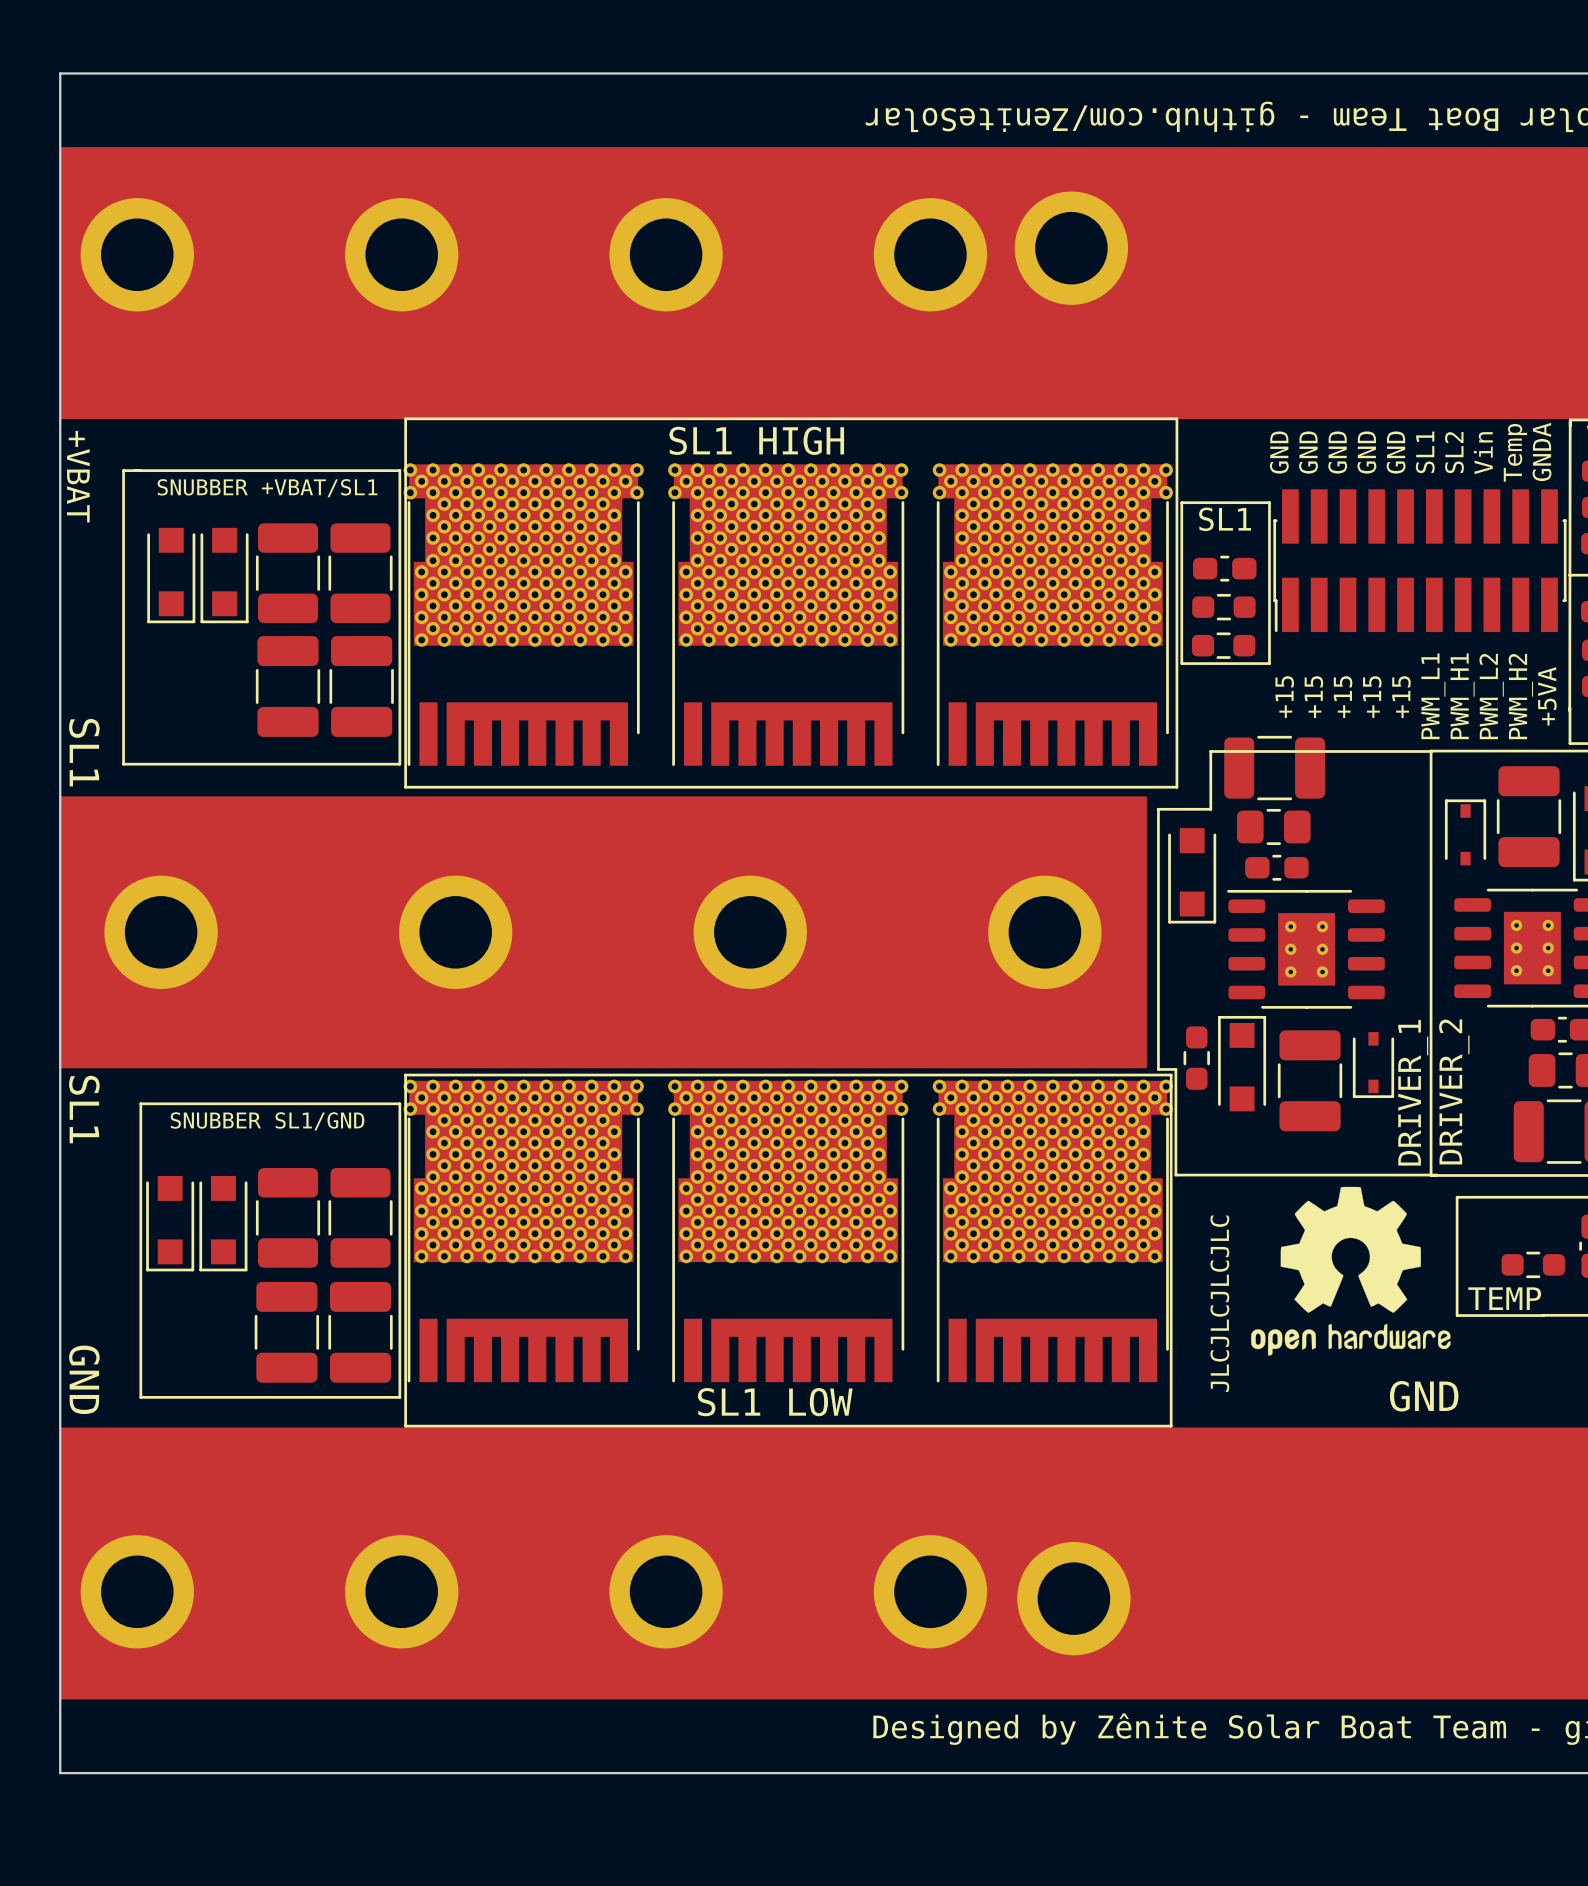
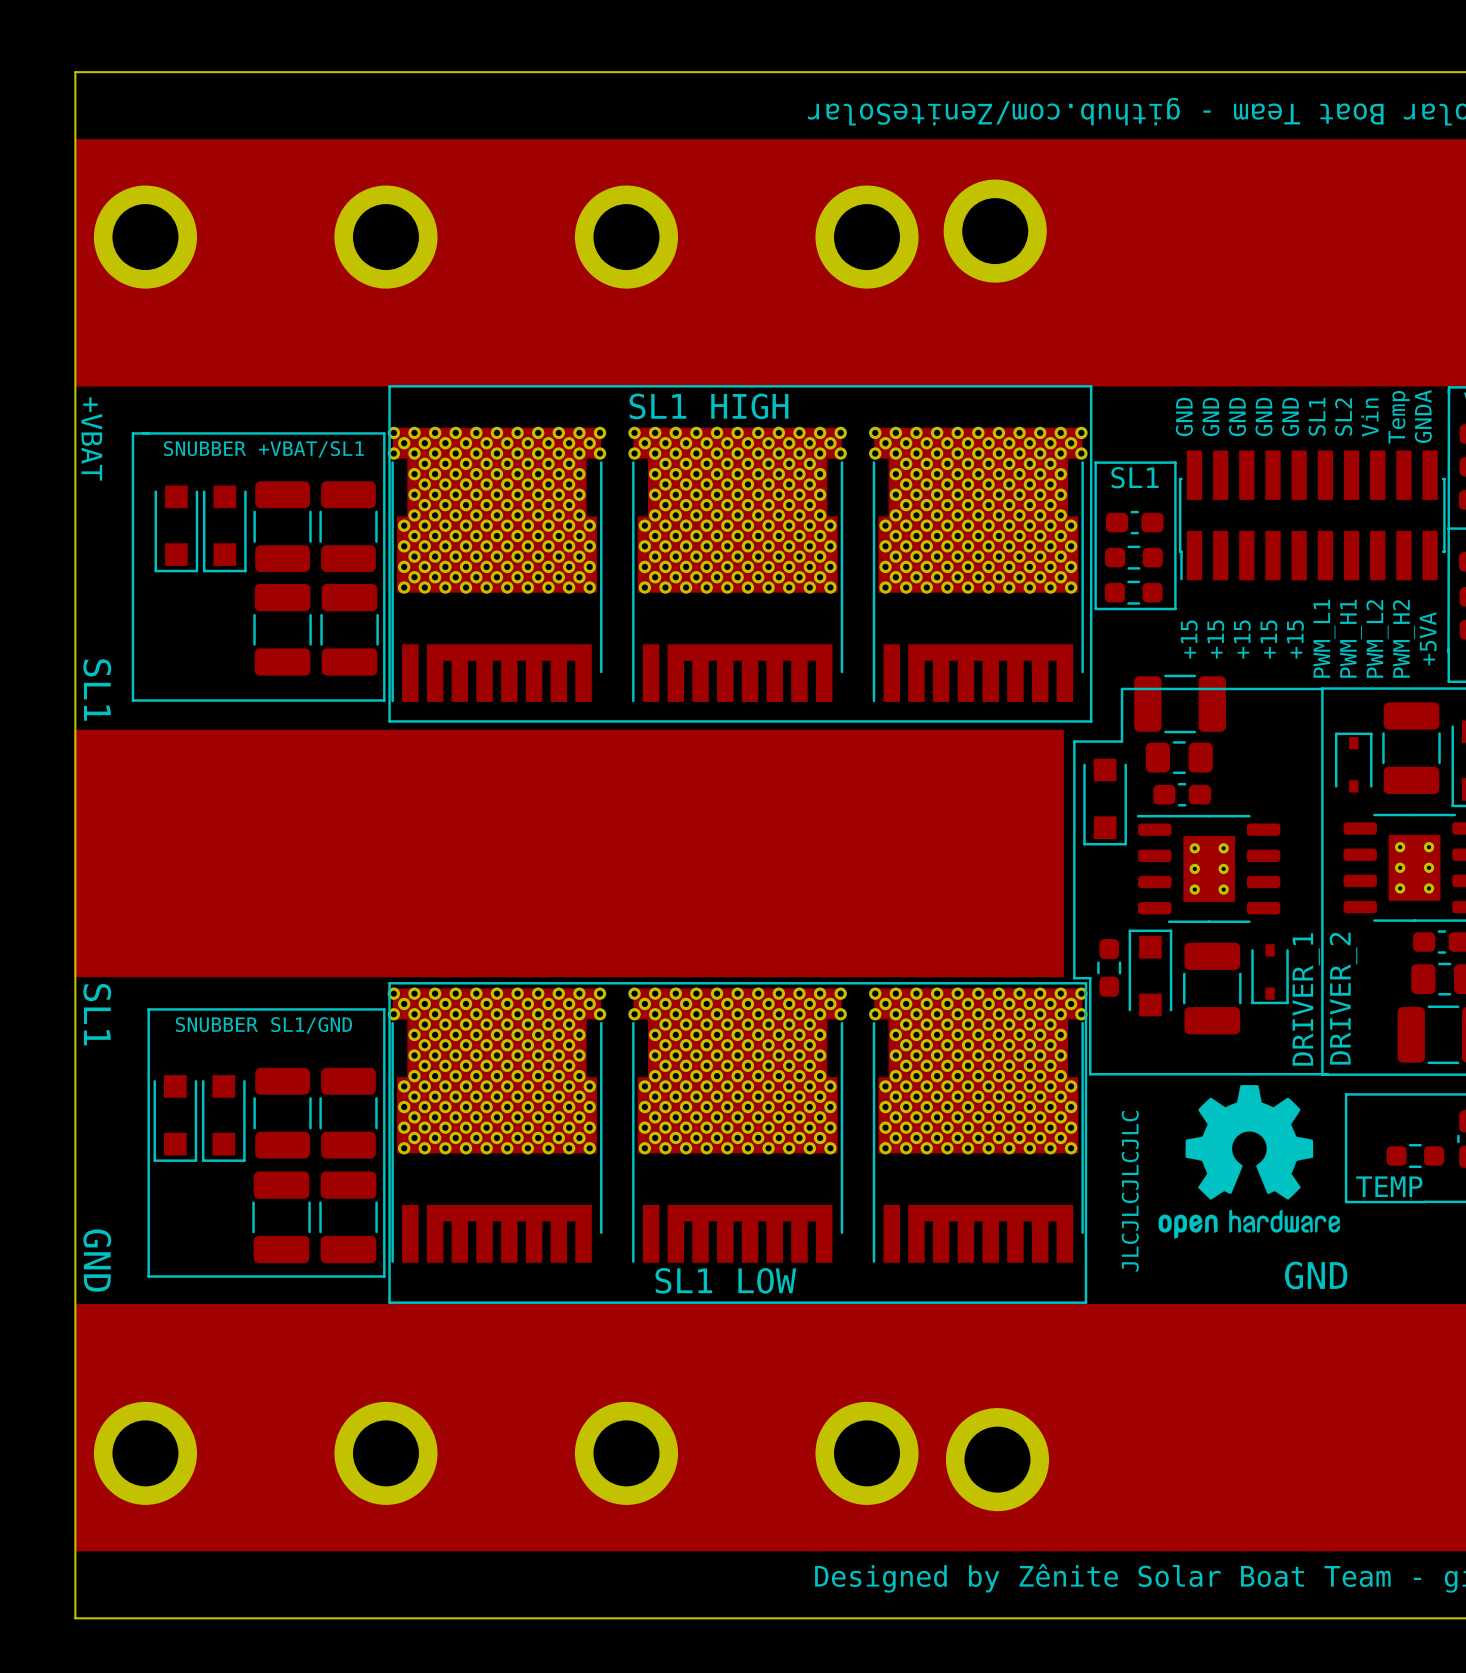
part footprint: [59, 796, 1147, 1069] -> [74, 729, 1064, 978]

